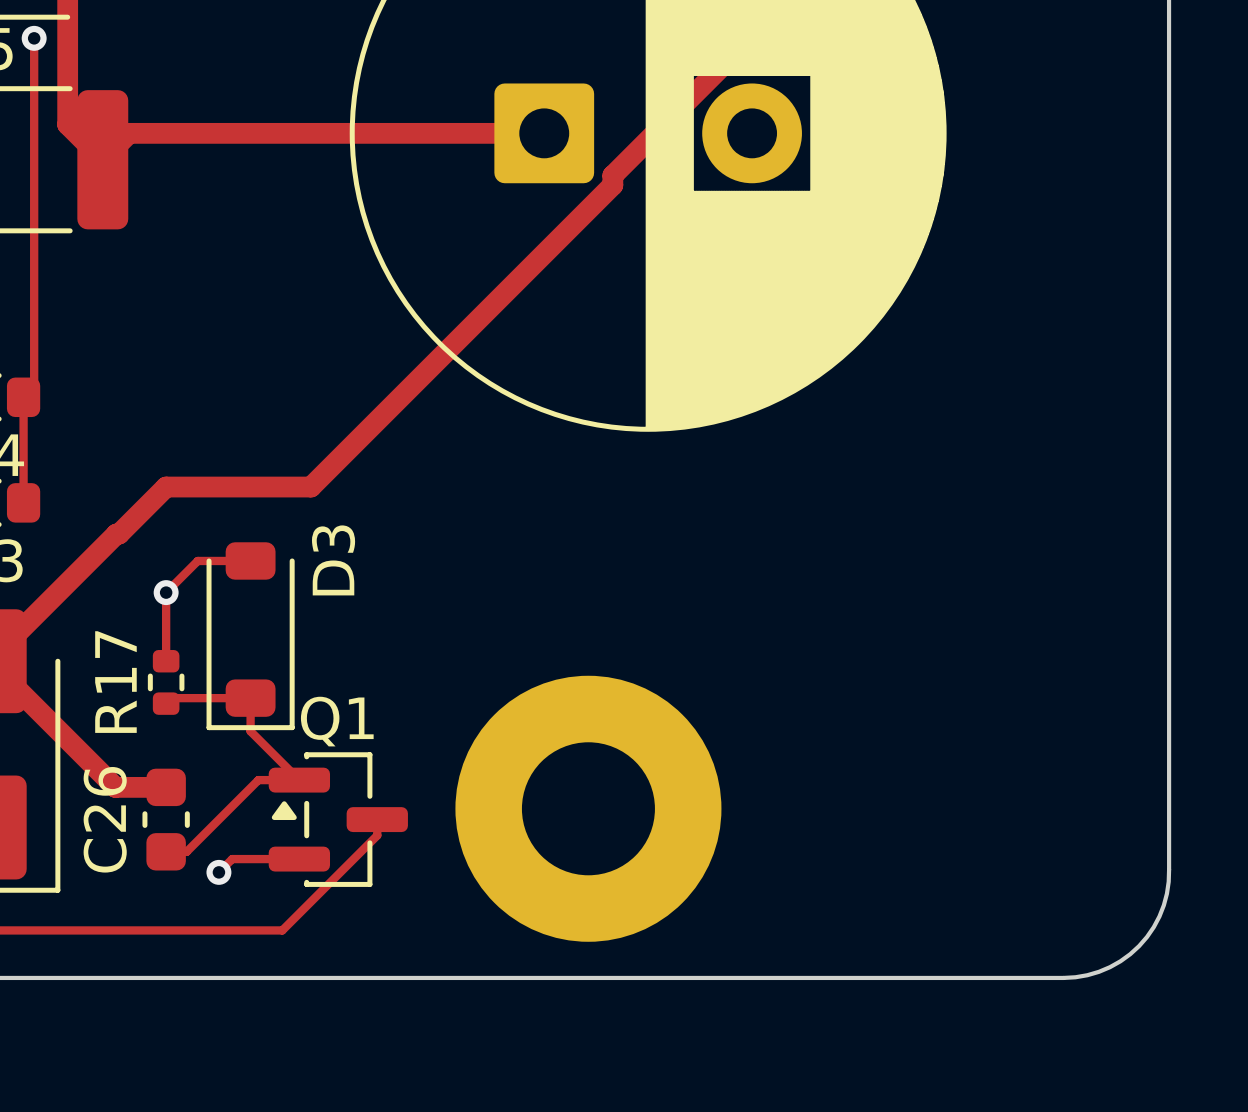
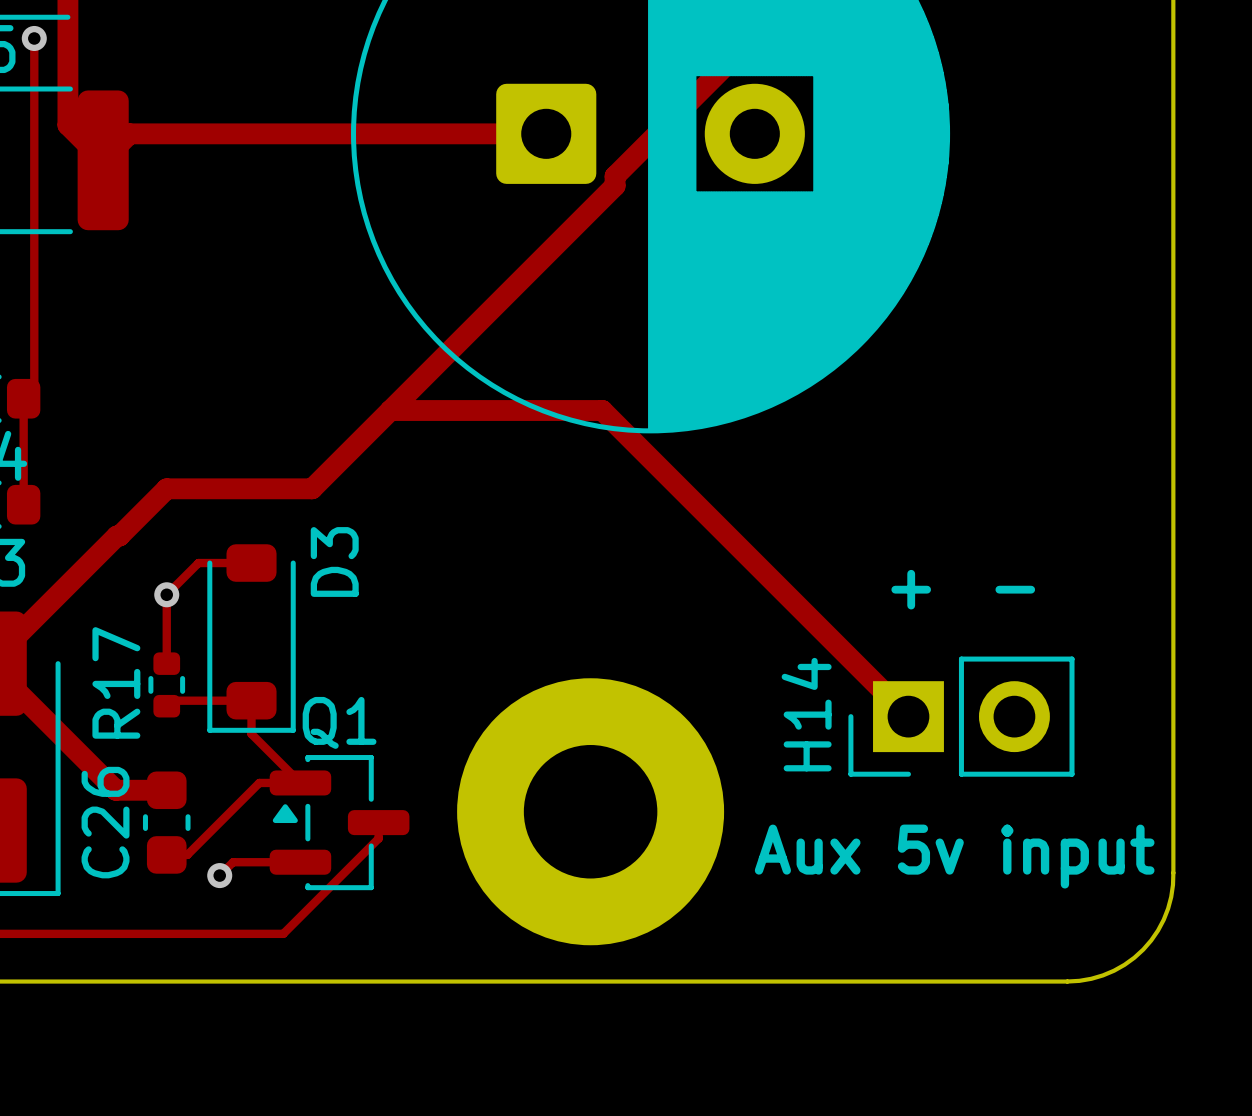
track: none -> (390, 410) (602, 410) (908, 716)
text: none -> + (911, 589)
text: none -> - (1015, 589)
H14: none -> (961, 716)
text: none -> Aux 5v input (954, 856)

